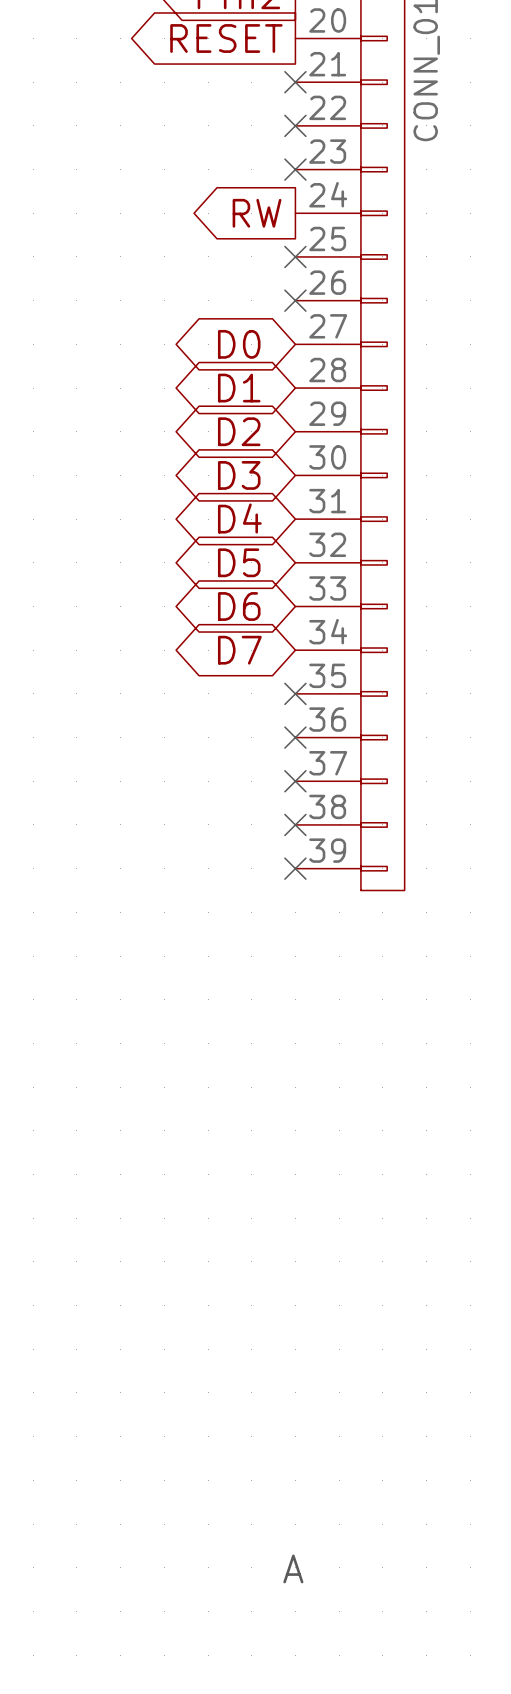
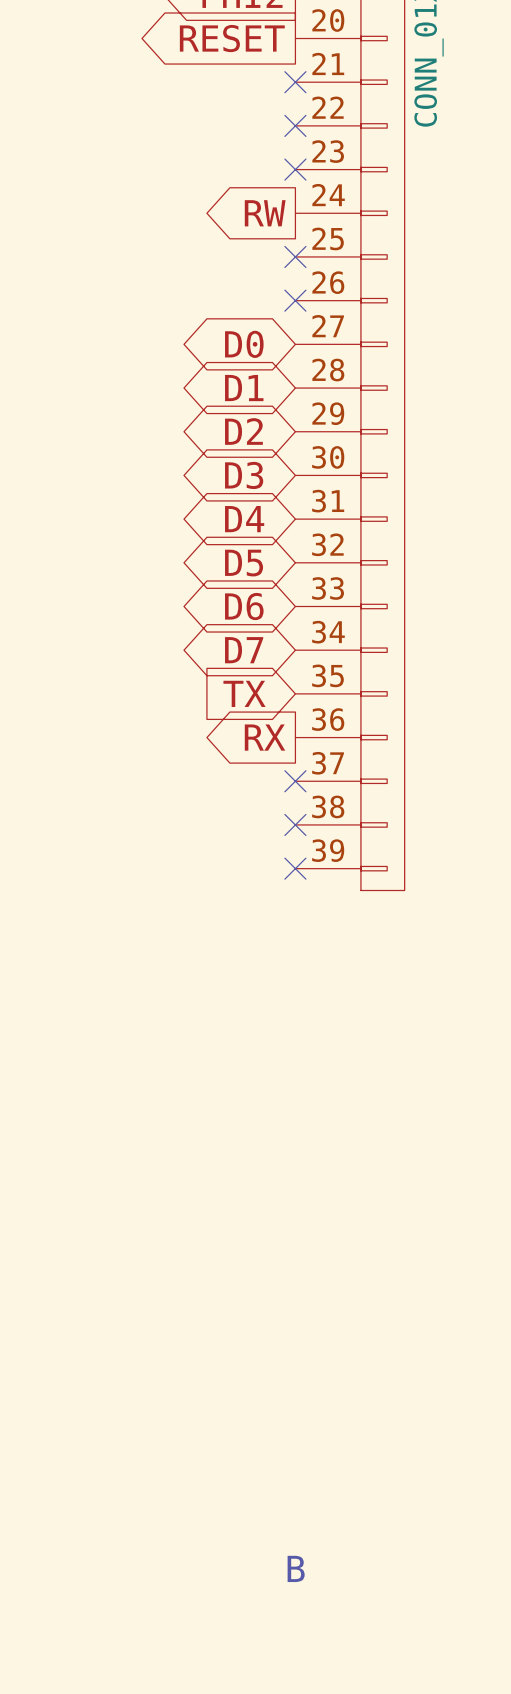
global label: none -> TX (244, 693)
no-connect mark: (295, 693) -> none
global label: none -> RX (265, 737)
no-connect mark: (295, 737) -> none
text: A (293, 1568) -> B (296, 1568)

